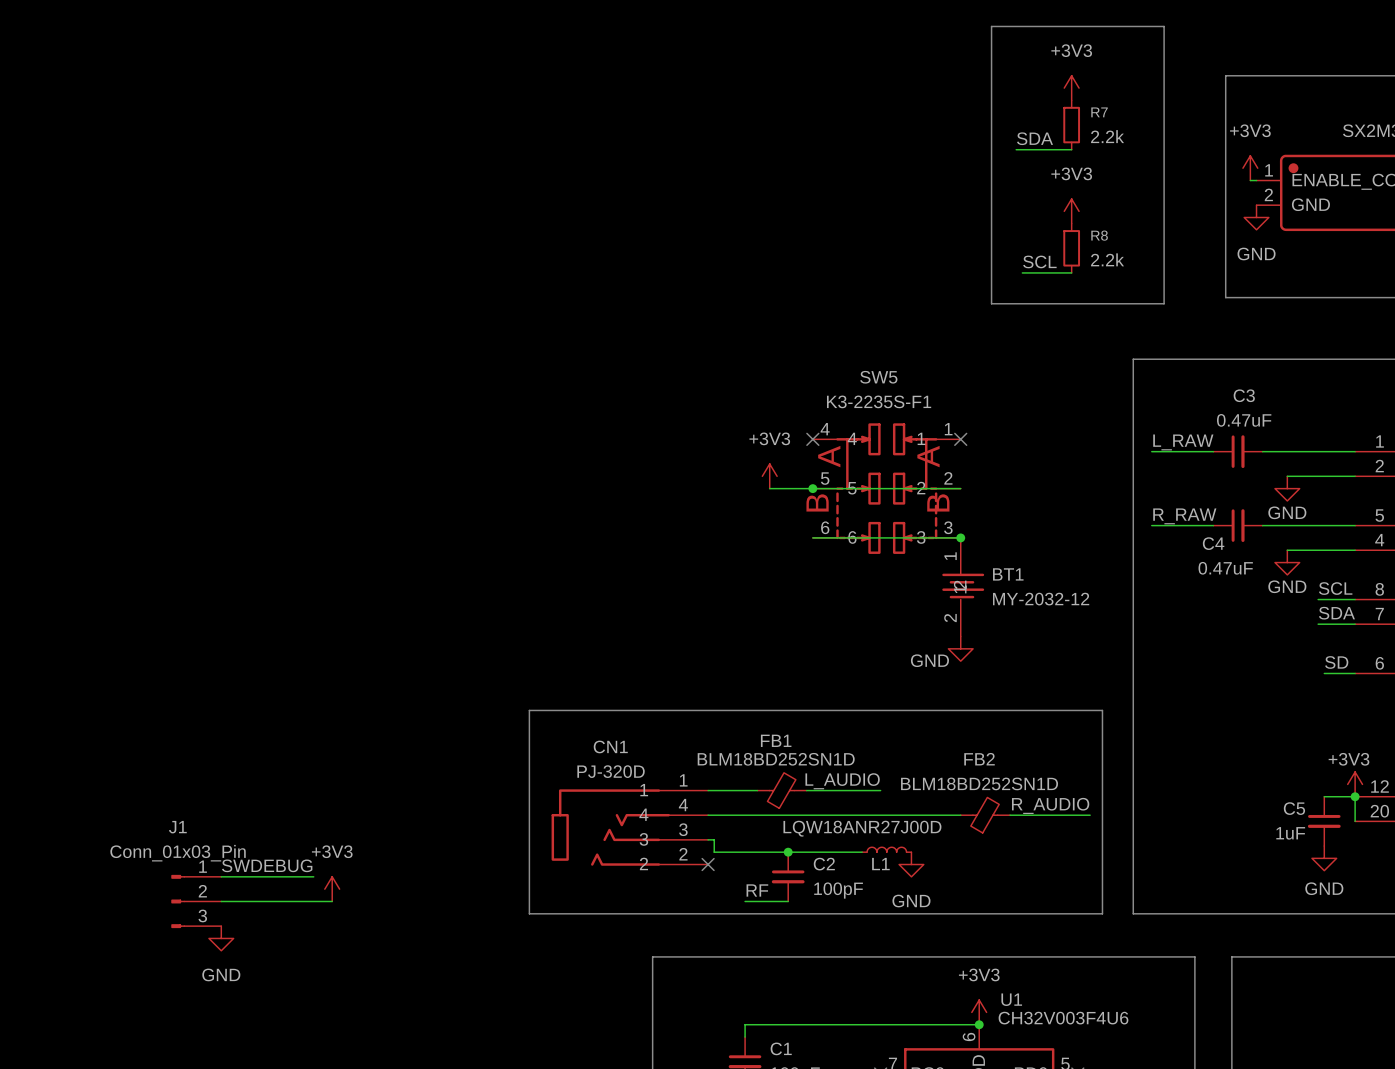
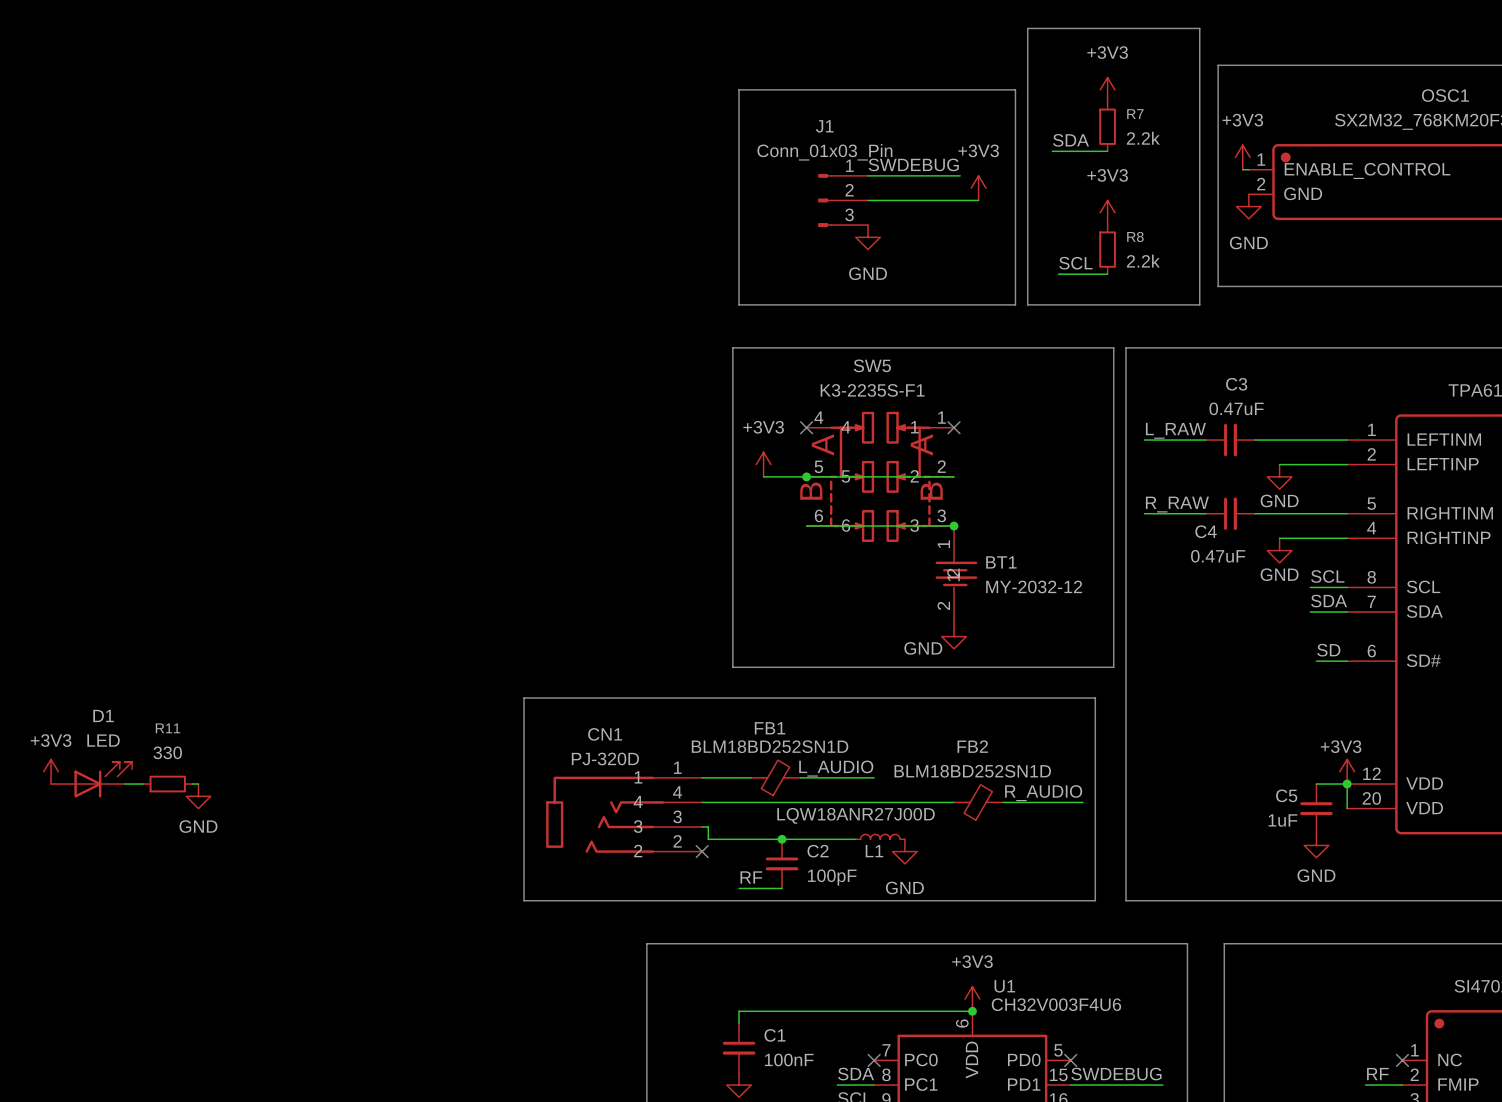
line: (991, 26) (1164, 26) (1164, 303) (991, 303) (991, 26) -> (1027, 28) (1199, 28) (1199, 304) (1027, 304) (1027, 28)
power symbol position: +3V3 (1071, 88) -> +3V3 (1107, 89)
line: none -> (739, 89) (1015, 89) (1015, 304) (739, 304) (739, 89)
R7 position: (1071, 125) -> (1107, 126)
label position: SDA (1035, 138) -> SDA (1071, 140)
wire: (1016, 149) (1071, 149) -> (1052, 151) (1107, 151)
label: none -> SWDEBUG (913, 164)
wire: none -> (868, 175) (960, 175)
power symbol: none -> +3V3 (978, 188)
wire: none -> (868, 200) (978, 200)
power symbol: +3V3 (1071, 211) -> none
power symbol: none -> +3V3 (1107, 212)
power symbol: none -> GND (868, 237)
R8 position: (1071, 248) -> (1107, 249)
label position: SCL (1039, 261) -> SCL (1075, 263)
wire: (1022, 272) (1071, 272) -> (1058, 274) (1107, 274)
line: none -> (732, 347) (1113, 347) (1113, 667) (732, 667) (732, 347)
power symbol: none -> +3V3 (51, 771)
D1: none -> LED (91, 779)
wire: none -> (124, 784) (143, 784)
R11: none -> 330 (167, 784)
wire: none -> (192, 784) (198, 784)
label: SWDEBUG (267, 865) -> none
wire: (221, 876) (313, 876) -> none
power symbol: +3V3 (332, 889) -> none
J1 position: (196, 901) -> (843, 200)
wire: (221, 901) (332, 901) -> none
power symbol position: GND (221, 938) -> GND (198, 796)
power symbol text position: GND (221, 974) -> GND (198, 826)

